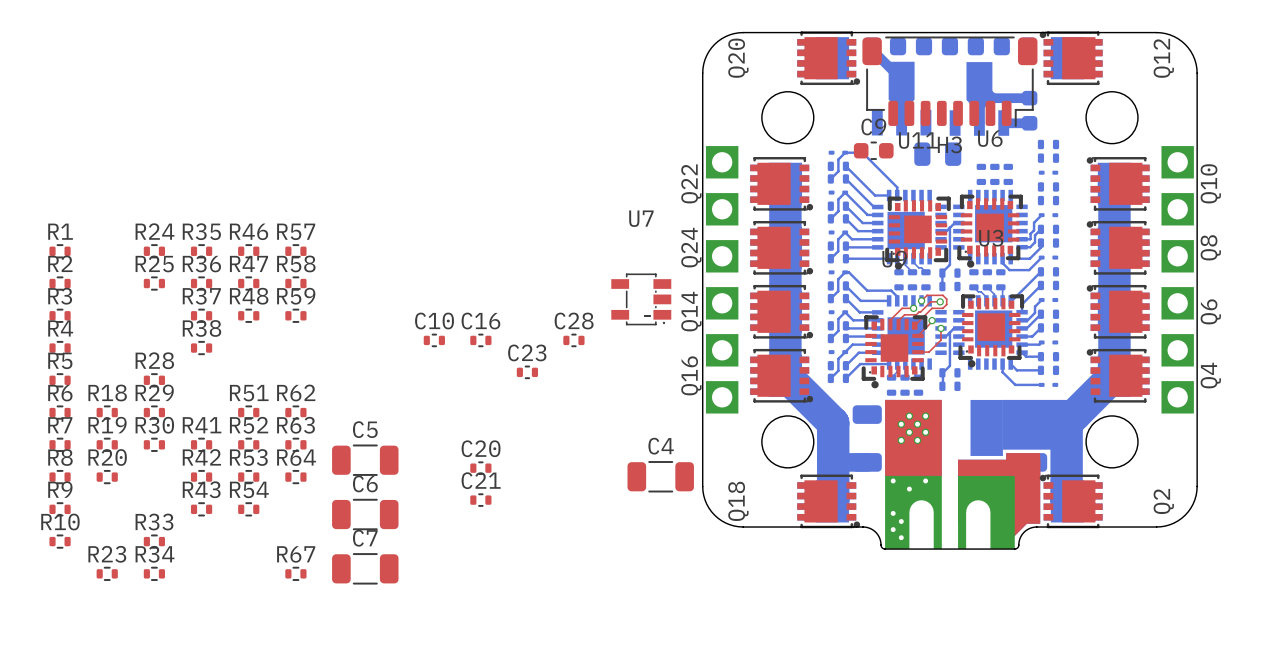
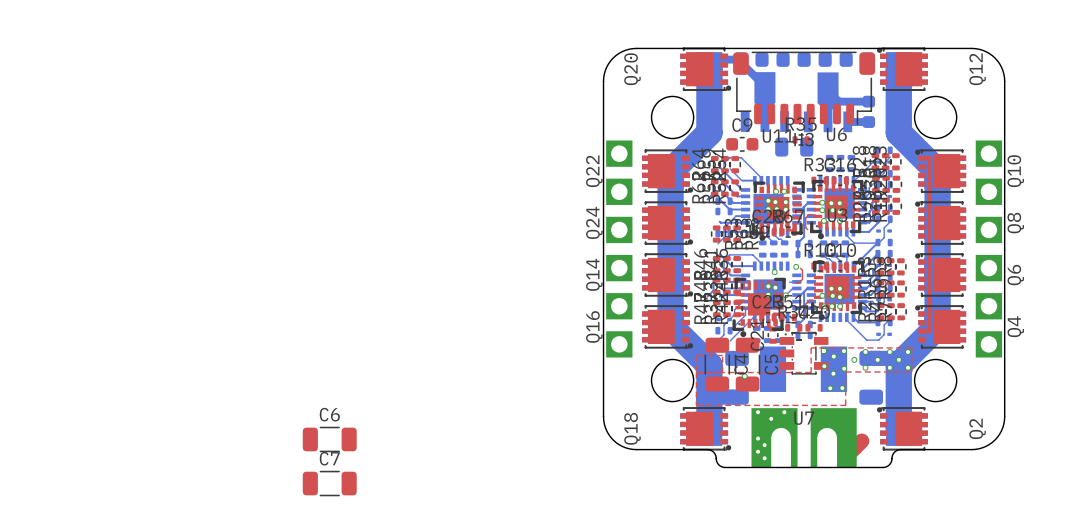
bottom track: none -> (740, 59) (718, 59) (708, 69) (709, 132) (670, 171)
bottom track: none -> (898, 69) (898, 132) (937, 171)
part: (1048, 144) -> none
part: (838, 152) -> none
part: (838, 166) -> none
bottom track: (845, 166) (875, 195) -> (730, 168) (743, 180)
bottom track: none -> (878, 157) (853, 180)
bottom track: none -> (890, 157) (884, 163) (884, 172) (869, 187) (869, 193) (862, 196)
top track: none -> (922, 158) (929, 158) (929, 331) (922, 331)
bottom track: (830, 178) (838, 171) (838, 159) (845, 152) (862, 152) (897, 187) (897, 192) -> (717, 179) (724, 173) (724, 163) (729, 157) (741, 157) (761, 177)
part: (838, 178) -> none
part: (838, 192) -> none
part: (838, 206) -> none
via: none -> (776, 191)
via: none -> (784, 191)
part: (838, 218) -> none
part: none -> (724, 201)
via: none -> (768, 200)
via: none -> (775, 202)
via: none -> (785, 202)
via: none -> (822, 202)
via: none -> (831, 203)
via: none -> (839, 203)
via: none -> (768, 209)
via: none -> (776, 209)
via: none -> (785, 209)
part: (838, 232) -> none
via: none -> (822, 210)
via: none -> (832, 210)
part: none -> (724, 211)
via: none -> (839, 211)
top track: none -> (812, 214) (809, 214) (805, 218) (805, 227) (807, 229)
bottom track: (865, 239) (851, 239) (845, 232) (838, 239) (838, 251) (830, 258) -> (735, 216) (724, 228) (724, 237) (717, 243)
top track: none -> (786, 220) (786, 225) (792, 232)
via: none -> (824, 220)
via: none -> (840, 220)
part: (838, 246) -> none
R1 rotation: 0° (60, 251) -> 90° clockwise (880, 289)
R1 position: (60, 251) -> (880, 289)
R24 rotation: 0° (154, 251) -> 90° clockwise (875, 206)
R24 position: (154, 251) -> (875, 206)
R35 position: (201, 251) -> (801, 139)
R46 rotation: 0° (248, 251) -> 90° clockwise (716, 264)
R46 position: (248, 251) -> (716, 264)
R57 rotation: 0° (295, 251) -> 90° clockwise (724, 187)
R57 position: (295, 251) -> (724, 187)
bottom track: (1041, 257) (1029, 270) (1009, 270) (1002, 263) -> (890, 221) (884, 227) (884, 237) (878, 243) (854, 243) (846, 235)
part: (838, 258) -> none
part: none -> (724, 233)
part: (838, 272) -> none
R2 rotation: 0° (60, 283) -> 90° clockwise (880, 311)
R2 position: (60, 283) -> (880, 311)
R25 rotation: 0° (154, 283) -> 90° clockwise (875, 184)
R25 position: (154, 283) -> (875, 184)
R36 rotation: 0° (201, 283) -> 90° clockwise (737, 264)
R36 position: (201, 283) -> (737, 264)
R47 rotation: 0° (248, 283) -> 90° clockwise (716, 308)
R47 position: (248, 283) -> (716, 308)
R58 rotation: 0° (295, 283) -> 90° clockwise (737, 234)
R58 position: (295, 283) -> (737, 234)
part: (838, 285) -> none
bottom track: (897, 297) (891, 290) (867, 290) (848, 272) (845, 272) (838, 279) (838, 291) (830, 298) -> (761, 263) (752, 254) (729, 254) (724, 260) (724, 270) (717, 276)
part: (838, 298) -> none
U7 rotation: 0° (641, 299) -> 180° (804, 353)
U7 position: (641, 299) -> (804, 353)
top track: (921, 300) (927, 295) (942, 295) (946, 299) (946, 304) (942, 308) (932, 308) (914, 325) -> none
via: (921, 300) -> none
top track: (940, 301) (930, 301) (916, 314) (904, 314) (898, 320) (898, 324) -> none
top track: none -> (800, 268) (802, 270) (802, 279) (795, 283)
top track: (913, 308) (902, 308) (890, 320) (890, 324) -> none
part: (838, 312) -> none
R3 rotation: 0° (60, 315) -> 90° clockwise (880, 266)
R3 position: (60, 315) -> (880, 266)
R37 rotation: 0° (201, 315) -> 90° clockwise (727, 308)
R37 position: (201, 315) -> (727, 308)
R48 rotation: 0° (248, 315) -> 90° clockwise (716, 286)
R48 position: (248, 315) -> (716, 286)
R59 rotation: 0° (295, 315) -> 90° clockwise (725, 164)
R59 position: (295, 315) -> (725, 164)
top track: (932, 320) (917, 335) -> none
via: (932, 320) -> none
part: (838, 325) -> none
via: none -> (768, 286)
via: none -> (775, 287)
bottom track: none -> (796, 288) (792, 288) (785, 295)
top track: (941, 328) (941, 340) (929, 352) (917, 352) -> none
via: (941, 328) -> none
via: none -> (831, 288)
via: none -> (839, 288)
via: none -> (768, 294)
via: none -> (785, 295)
via: none -> (822, 295)
via: none -> (832, 295)
part: (838, 338) -> none
via: none -> (839, 297)
C10 position: (434, 340) -> (840, 265)
C16 position: (480, 340) -> (840, 180)
C28 position: (573, 340) -> (768, 232)
top track: none -> (812, 300) (805, 304) (805, 312) (807, 315)
bottom track: (1041, 342) (1034, 344) -> (890, 286) (884, 292) (884, 302) (878, 307) (872, 301)
bottom track: (874, 344) (852, 344) (838, 358) (838, 370) (830, 378) -> (742, 301) (734, 309) (734, 314) (724, 325) (724, 334) (717, 340)
R4 rotation: 0° (60, 348) -> 90° clockwise (890, 311)
R4 position: (60, 348) -> (890, 311)
R38 rotation: 0° (201, 348) -> 90° clockwise (726, 286)
R38 position: (201, 348) -> (726, 286)
via: none -> (824, 306)
via: none -> (832, 306)
via: none -> (840, 306)
part position: (838, 352) -> (724, 319)
bottom track: (877, 352) (858, 352) (845, 365) -> (745, 308) (745, 315) (730, 330)
part: (1048, 356) -> none
bottom track: (887, 364) (860, 364) (845, 378) -> (753, 317) (730, 340)
part: (838, 365) -> none
bottom track: (1002, 367) (1002, 372) (1015, 384) (1041, 384) -> (846, 320) (866, 340) (878, 340) (884, 334) (884, 324) (890, 318)
C23 position: (527, 372) -> (768, 317)
part: (838, 378) -> none
R5 rotation: 0° (60, 380) -> 90° clockwise (890, 266)
R5 position: (60, 380) -> (890, 266)
R28 rotation: 0° (154, 380) -> 90° clockwise (875, 161)
R28 position: (154, 380) -> (875, 161)
part: none -> (724, 330)
drawing: [885, 399, 1069, 524] -> none
via: none -> (823, 350)
via: none -> (843, 351)
via: none -> (865, 352)
via: none -> (889, 352)
via: none -> (908, 352)
R6 rotation: 0° (60, 412) -> 90° clockwise (890, 289)
R6 position: (60, 412) -> (890, 289)
R18 rotation: 0° (107, 412) -> 90° clockwise (885, 161)
R18 position: (107, 412) -> (885, 161)
R29 rotation: 0° (154, 412) -> 90° clockwise (886, 206)
R29 position: (154, 412) -> (886, 206)
R51 position: (248, 412) -> (788, 317)
R62 rotation: 0° (295, 412) -> 90° clockwise (714, 187)
R62 position: (295, 412) -> (714, 187)
via: none -> (833, 356)
via: (909, 416) -> none
via: (925, 416) -> none
via: none -> (854, 359)
via: none -> (877, 359)
via: none -> (898, 359)
via: (901, 424) -> none
via: (917, 424) -> none
via: none -> (824, 366)
via: none -> (865, 367)
via: none -> (889, 367)
via: none -> (908, 367)
via: none -> (844, 368)
top zone outline: none -> (696, 372) (696, 405) (845, 405) (845, 371) (911, 371) (911, 347) (811, 347) (811, 372) (696, 372)
top zone outline: none -> (696, 372) (696, 355) (722, 355) (722, 372)
via: (909, 432) -> none
via: (925, 432) -> none
via: none -> (833, 373)
via: none -> (744, 376)
via: (901, 440) -> none
via: (917, 440) -> none
R7 rotation: 0° (60, 444) -> 90° clockwise (901, 311)
R7 position: (60, 444) -> (901, 311)
R19 rotation: 0° (107, 444) -> 90° clockwise (896, 206)
R19 position: (107, 444) -> (896, 206)
R30 rotation: 0° (154, 444) -> 90° clockwise (886, 184)
R30 position: (154, 444) -> (886, 184)
R41 rotation: 0° (201, 444) -> 90° clockwise (726, 264)
R41 position: (201, 444) -> (726, 264)
R52 rotation: 0° (248, 444) -> 90° clockwise (735, 187)
R52 position: (248, 444) -> (735, 187)
R63 rotation: 0° (295, 444) -> 90° clockwise (726, 234)
R63 position: (295, 444) -> (726, 234)
via: none -> (830, 388)
via: none -> (842, 388)
C5 rotation: 0° (365, 460) -> 90° clockwise (747, 364)
C5 position: (365, 460) -> (747, 364)
C20 position: (480, 468) -> (814, 327)
C4 rotation: 0° (660, 476) -> 90° clockwise (717, 364)
C4 position: (660, 476) -> (717, 364)
R8 rotation: 0° (60, 477) -> 90° clockwise (900, 266)
R8 position: (60, 477) -> (900, 266)
R20 rotation: 0° (107, 477) -> 90° clockwise (896, 184)
R20 position: (107, 477) -> (896, 184)
R42 rotation: 0° (201, 477) -> 90° clockwise (737, 308)
R42 position: (201, 477) -> (737, 308)
R53 rotation: 0° (248, 477) -> 90° clockwise (716, 234)
R53 position: (248, 477) -> (716, 234)
R64 rotation: 0° (295, 477) -> 90° clockwise (714, 164)
R64 position: (295, 477) -> (714, 164)
C21 rotation: 0° (480, 500) -> 90° clockwise (773, 335)
C21 position: (480, 500) -> (773, 335)
R9 rotation: 0° (60, 509) -> 90° clockwise (901, 289)
R9 position: (60, 509) -> (901, 289)
R43 rotation: 0° (201, 509) -> 90° clockwise (737, 286)
R43 position: (201, 509) -> (737, 286)
R54 rotation: 0° (248, 509) -> 90° clockwise (735, 164)
R54 position: (248, 509) -> (735, 164)
board edge: (830, 527) (868, 528) (877, 533) (881, 546) (885, 549) -> (707, 449) (714, 452) (717, 463) (722, 466) (751, 467)
board edge: (1069, 527) (1030, 528) (1022, 533) (1018, 546) (1014, 549) -> (900, 449) (893, 452) (890, 463) (885, 466) (856, 467)
R10 position: (60, 541) -> (819, 265)
R33 position: (154, 541) -> (819, 180)
R23 rotation: 0° (107, 573) -> 90° clockwise (895, 161)
R23 position: (107, 573) -> (895, 161)
R34 position: (154, 573) -> (793, 327)
R67 position: (295, 573) -> (788, 232)

